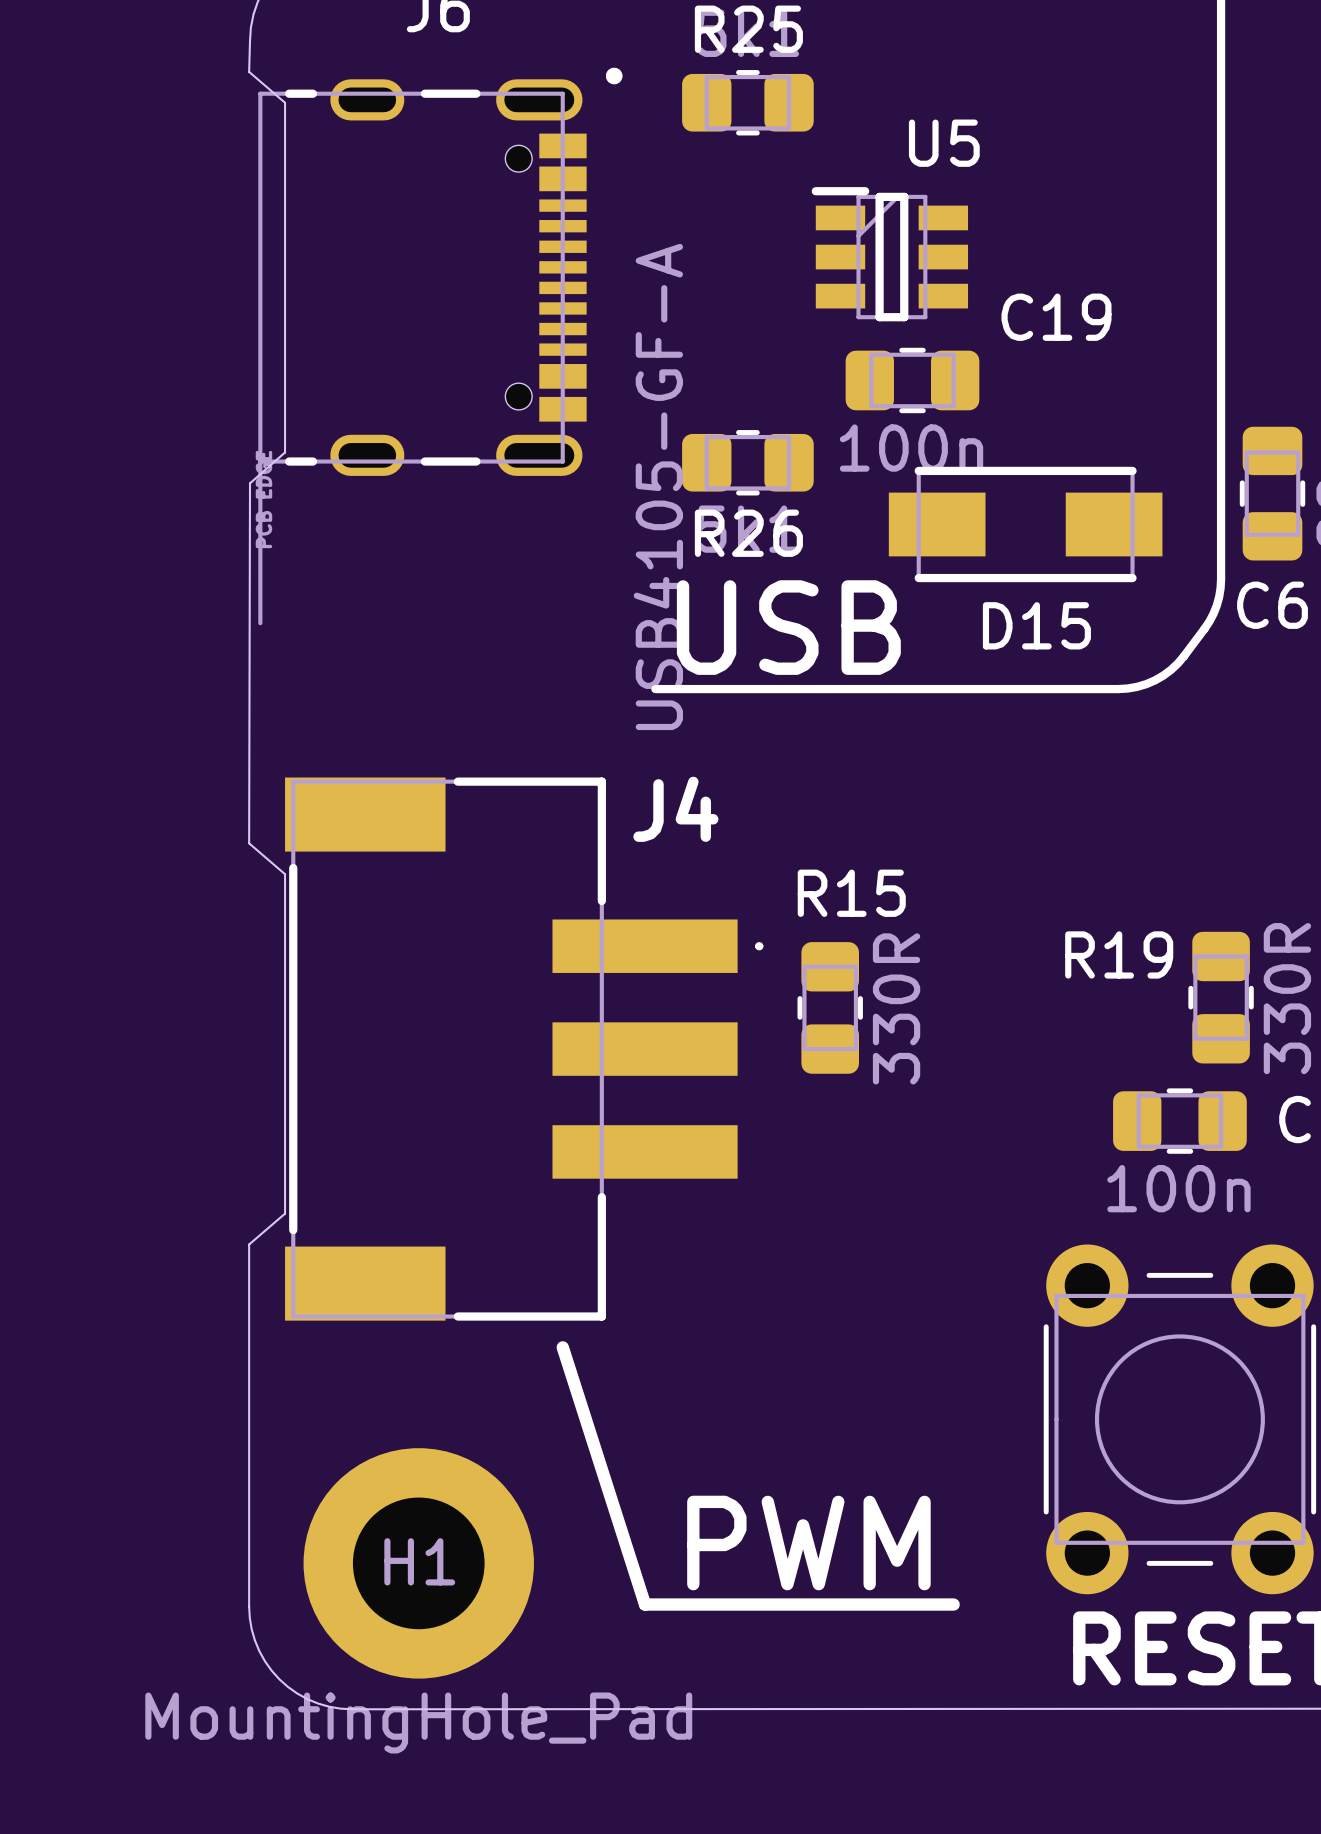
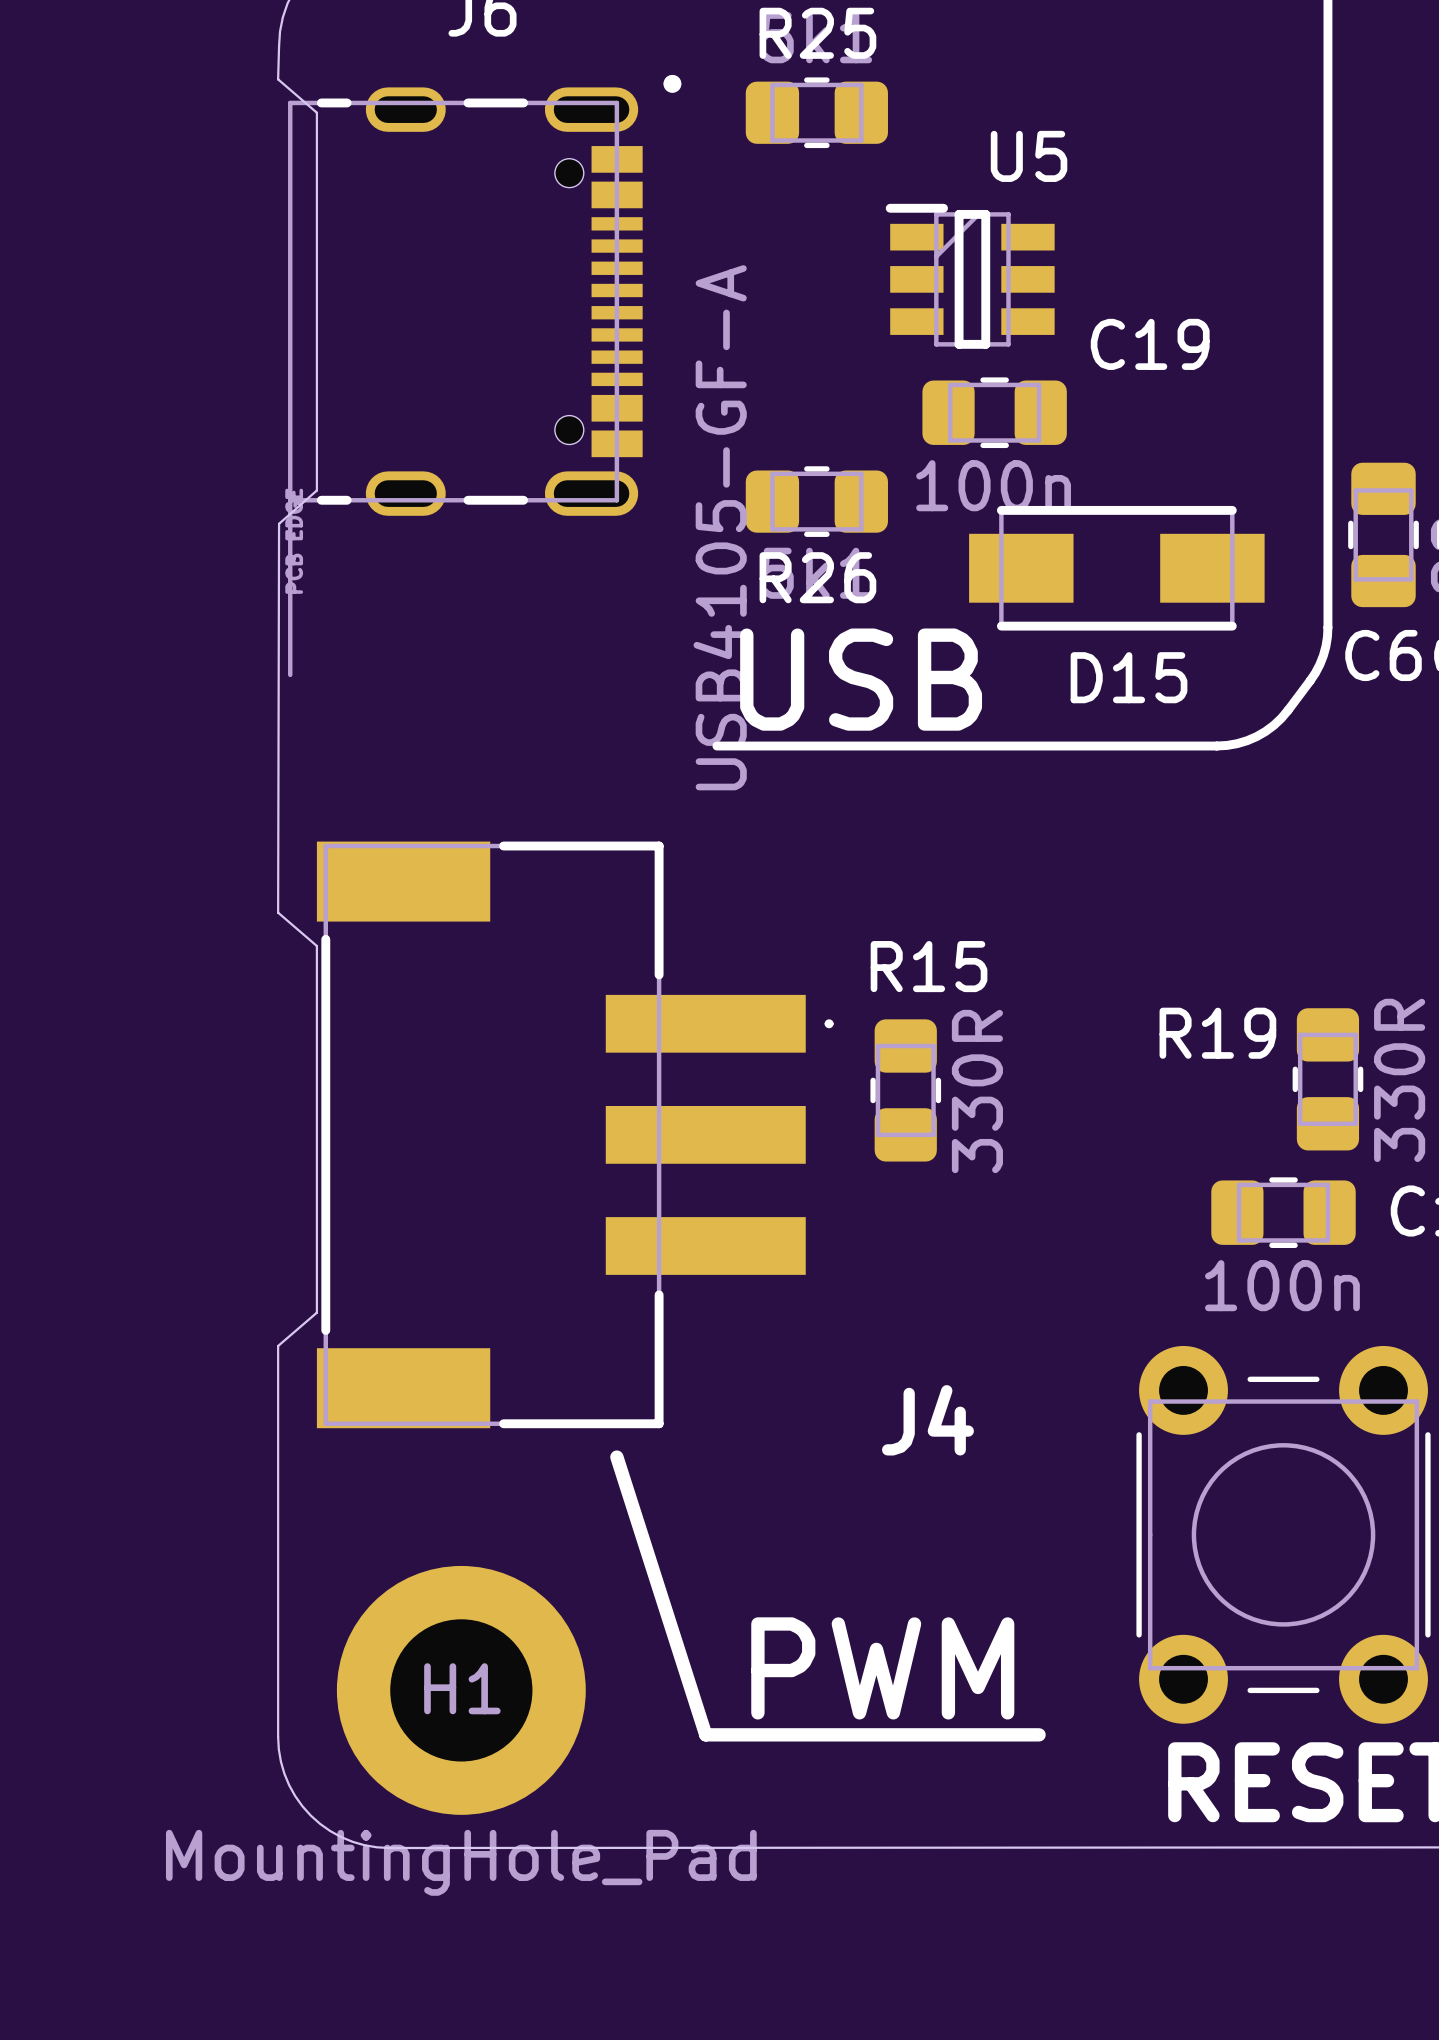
J4 name position: J4 (675, 809) -> J4 (927, 1420)

